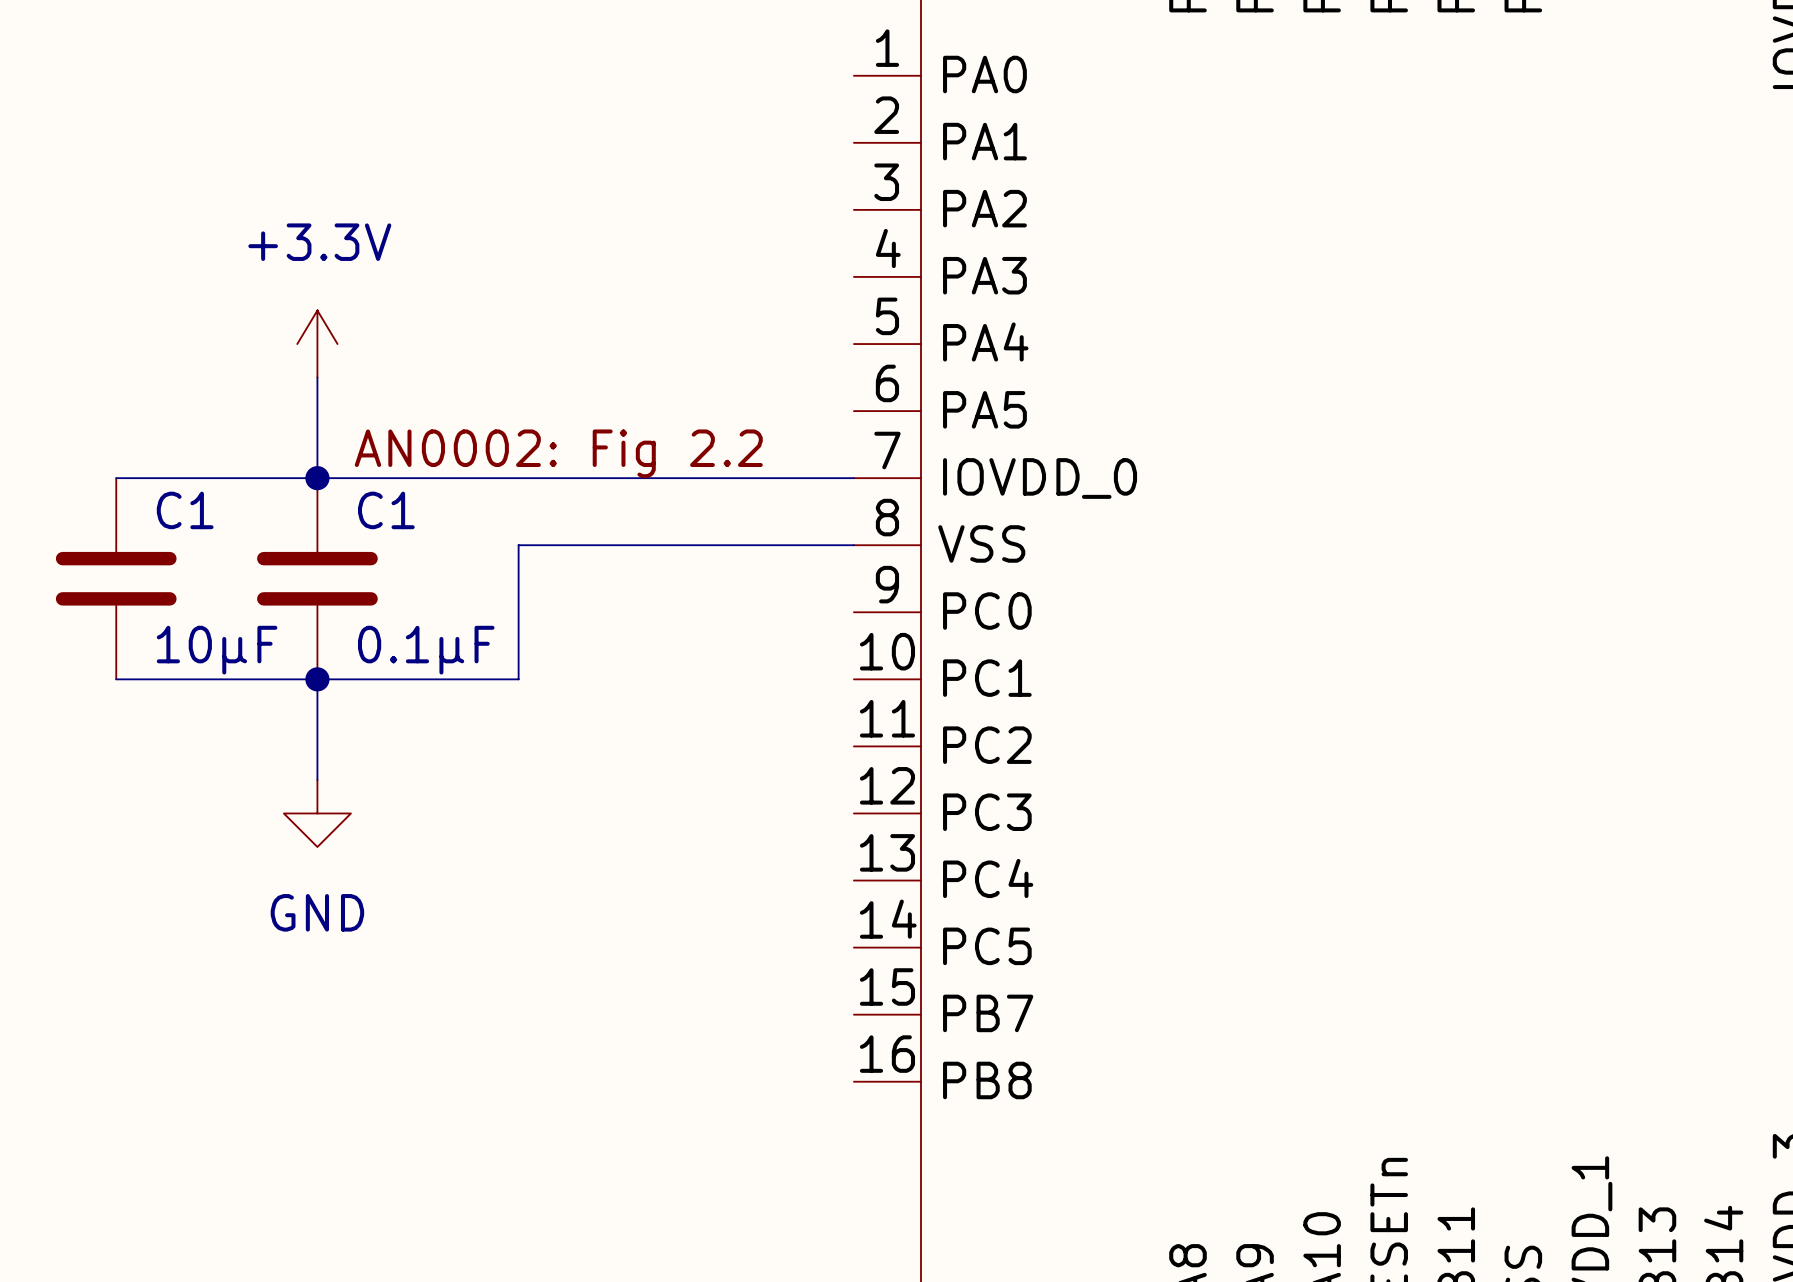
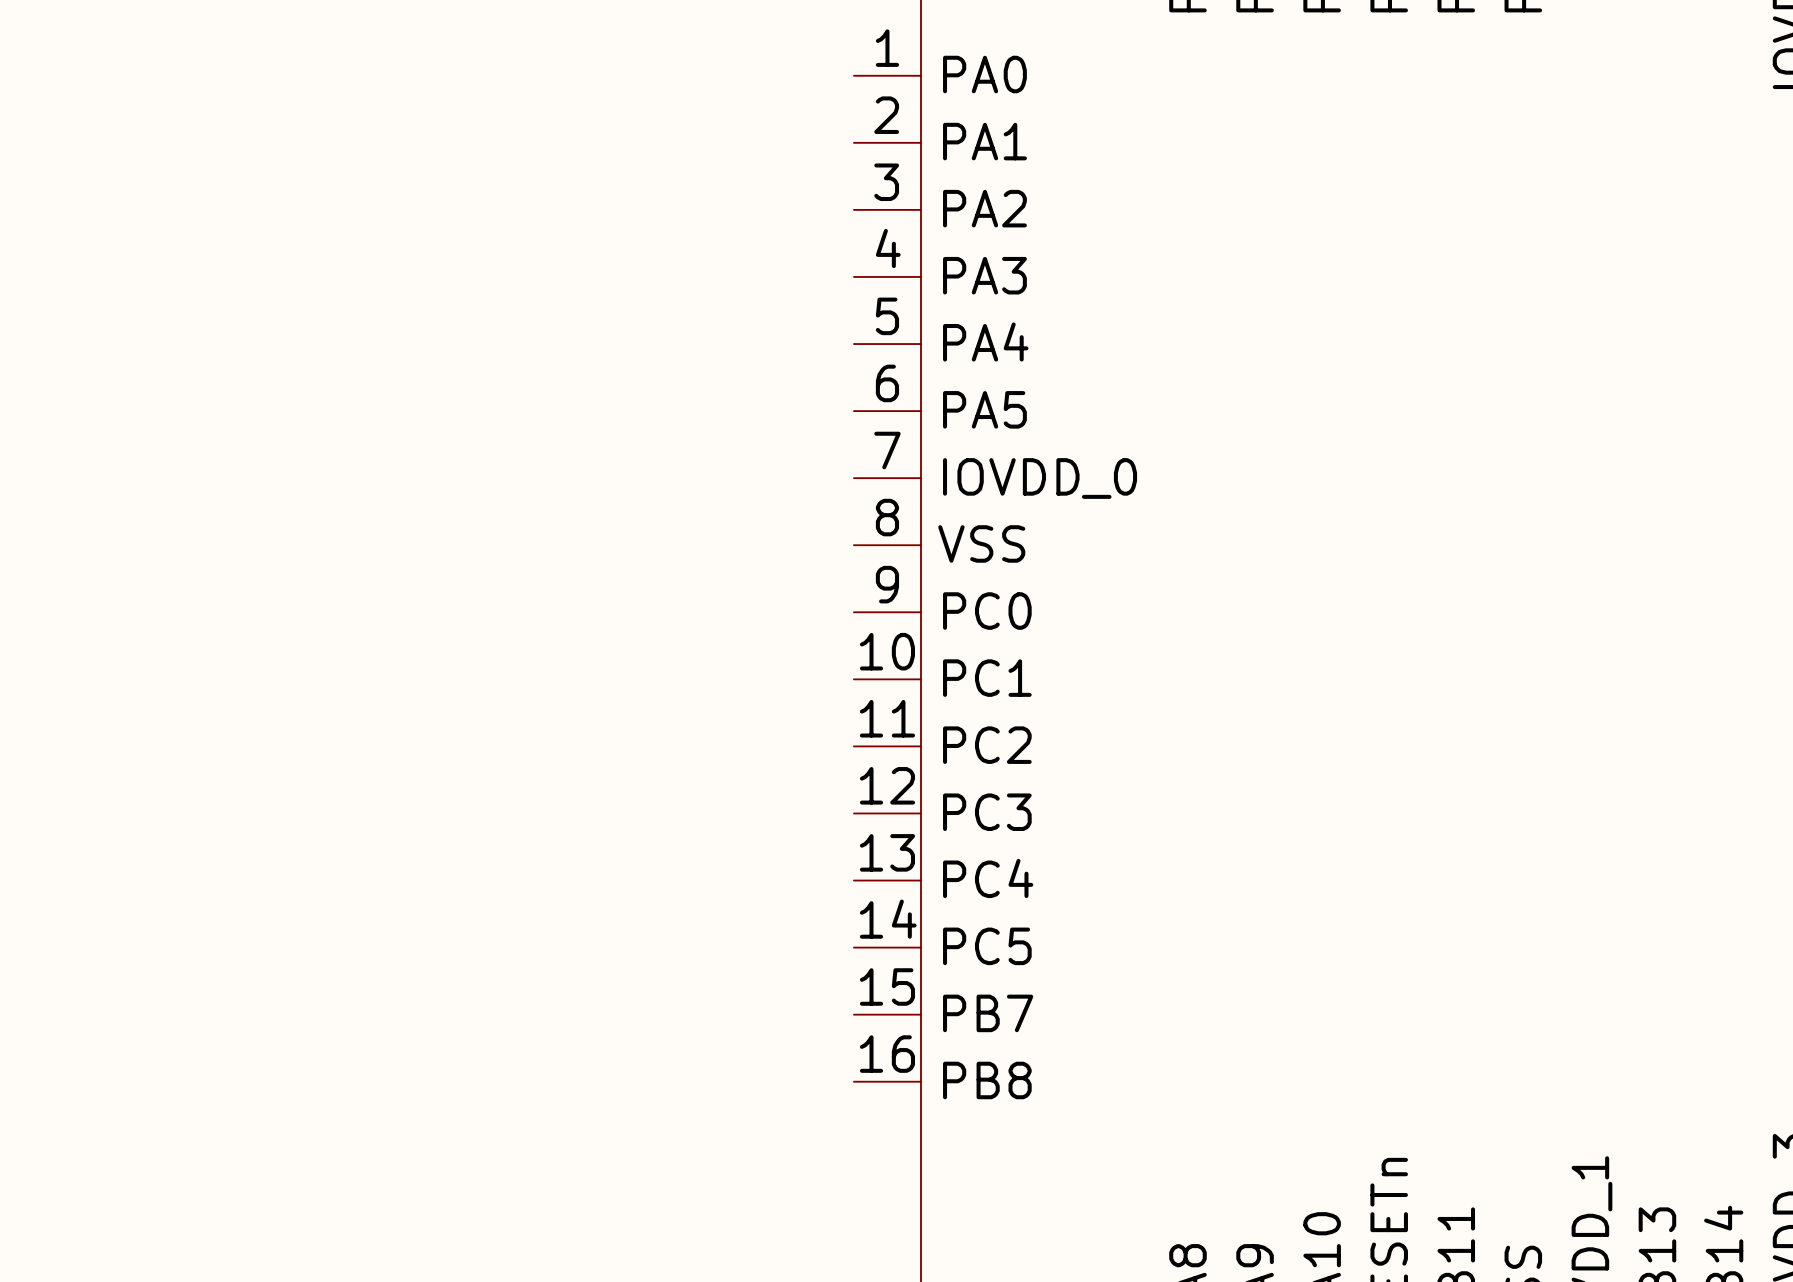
power symbol: +3.3V (317, 344) -> none
wire: (317, 377) (317, 478) -> none
label: AN0002: Fig 2.2 (558, 453) -> none
wire: (116, 478) (853, 478) -> none
junction: (317, 478) -> none
wire: (853, 545) (518, 545) (518, 679) (116, 679) -> none
C1: 10µF (116, 578) -> none
C1: 0.1µF (317, 578) -> none
wire: (317, 679) (317, 779) -> none
junction: (317, 679) -> none
power symbol: GND (317, 813) -> none

